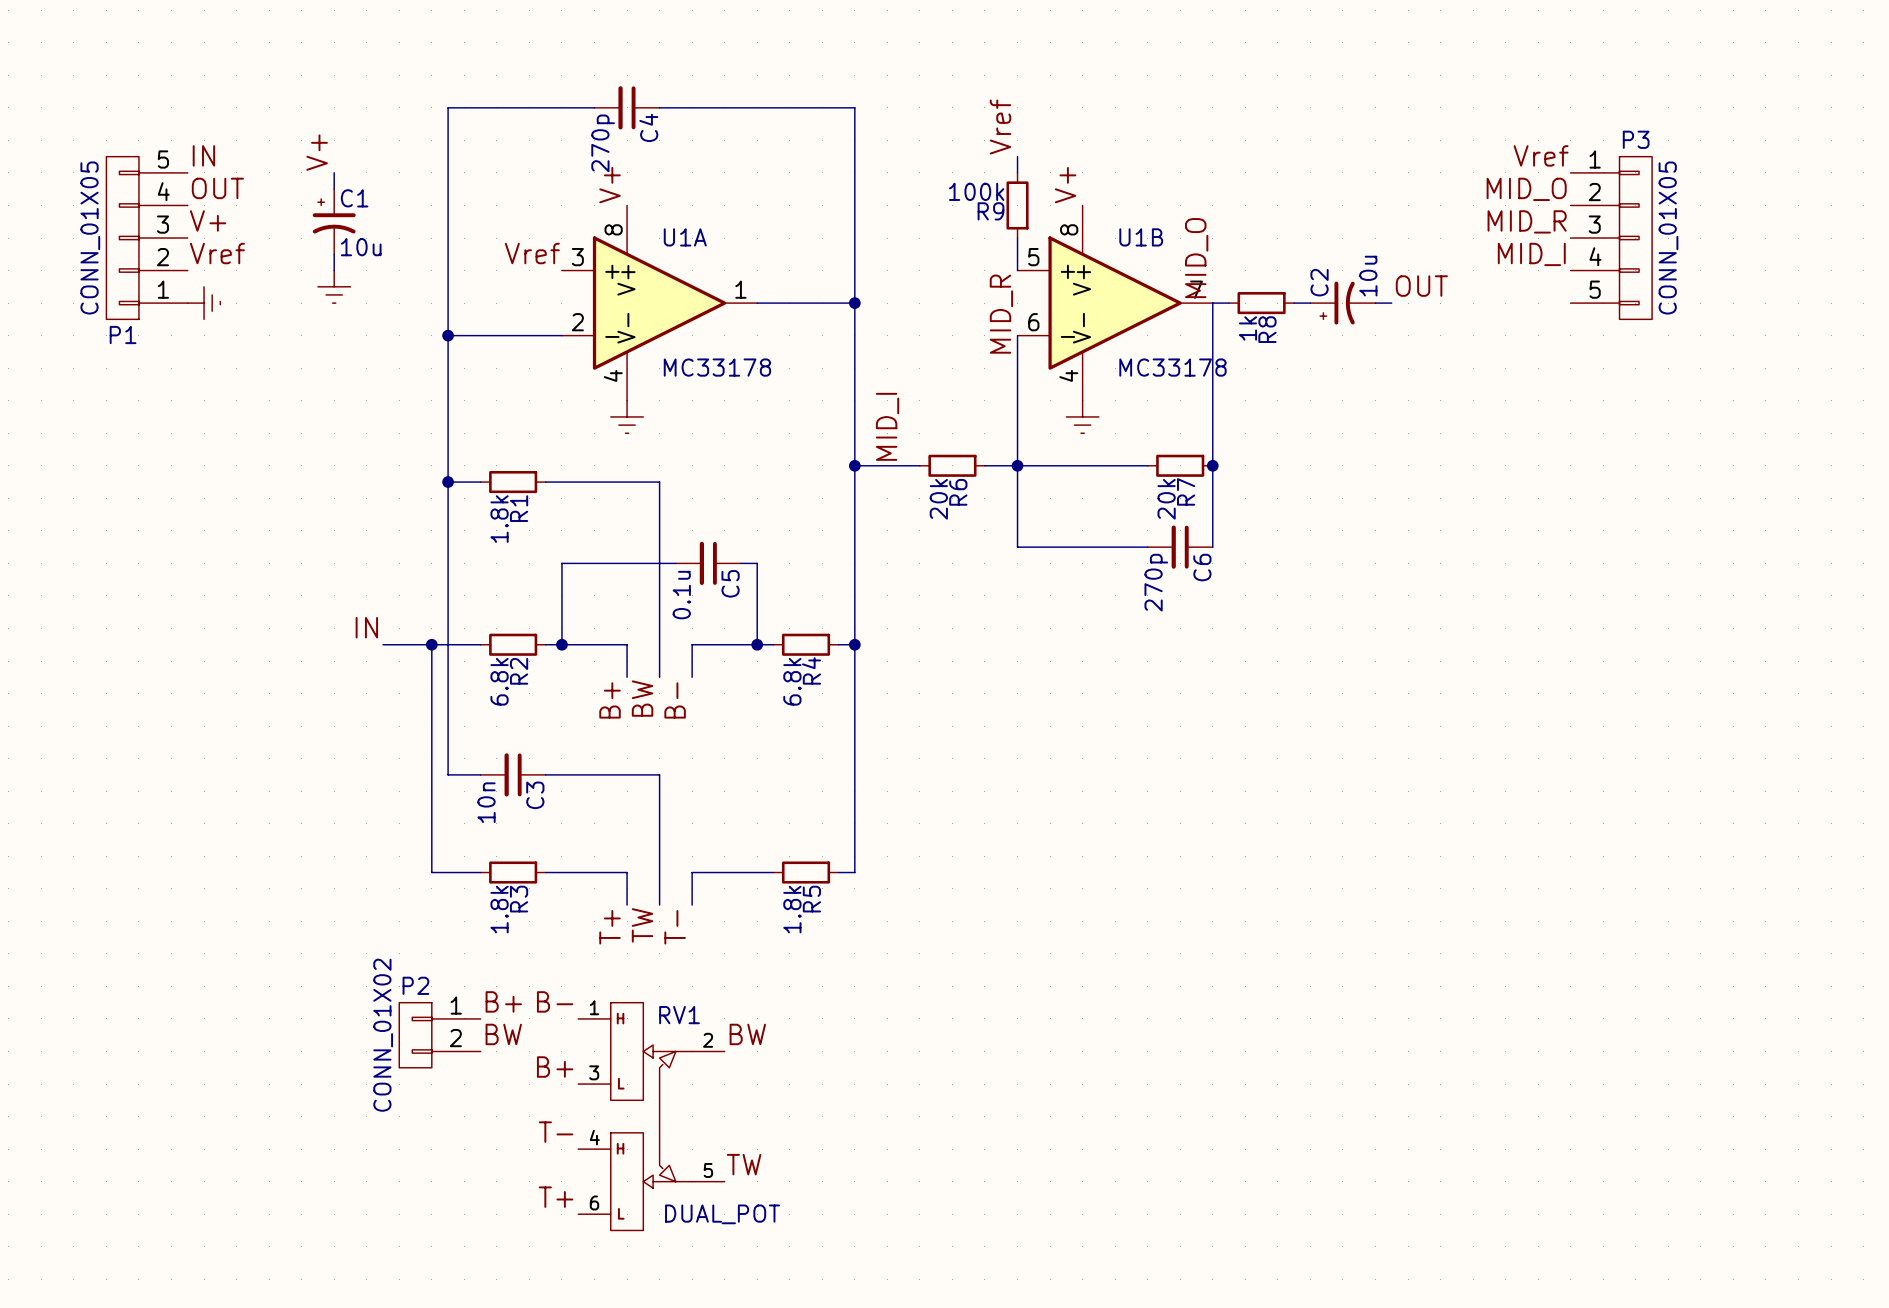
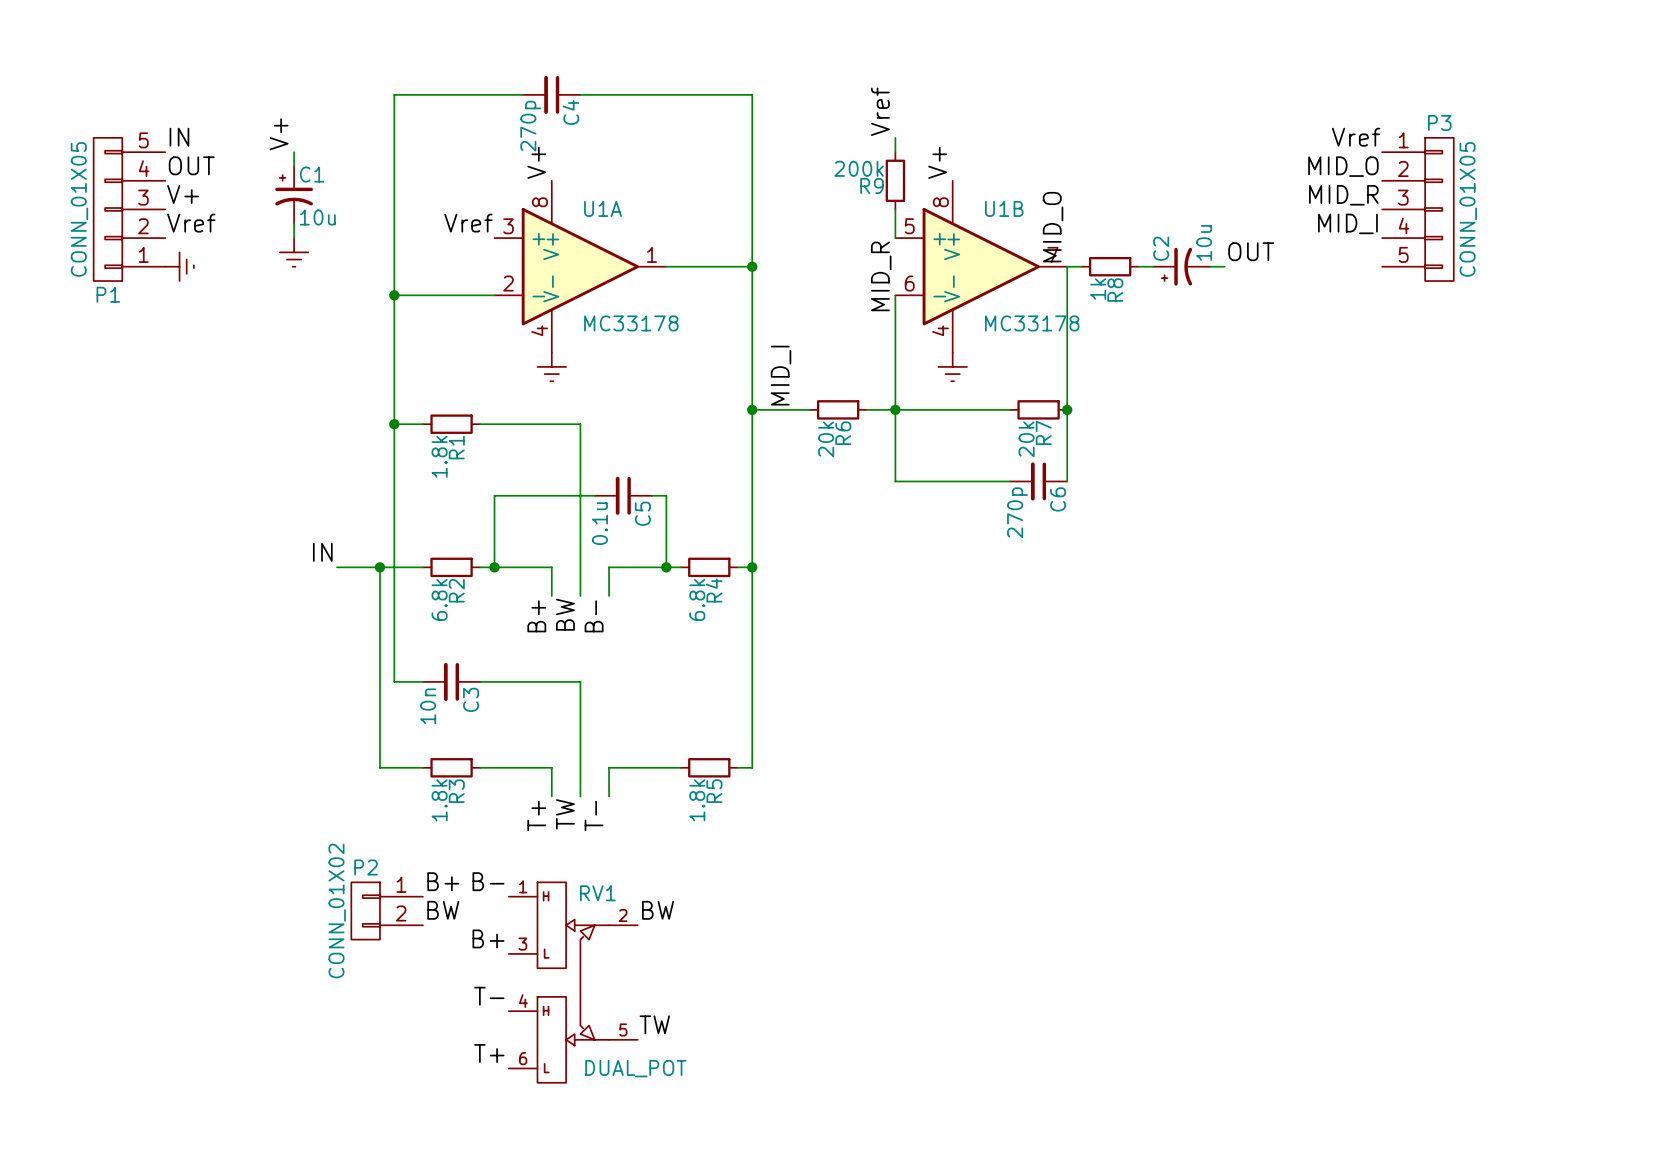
R9 value: 100k (976, 191) -> 200k (859, 168)

